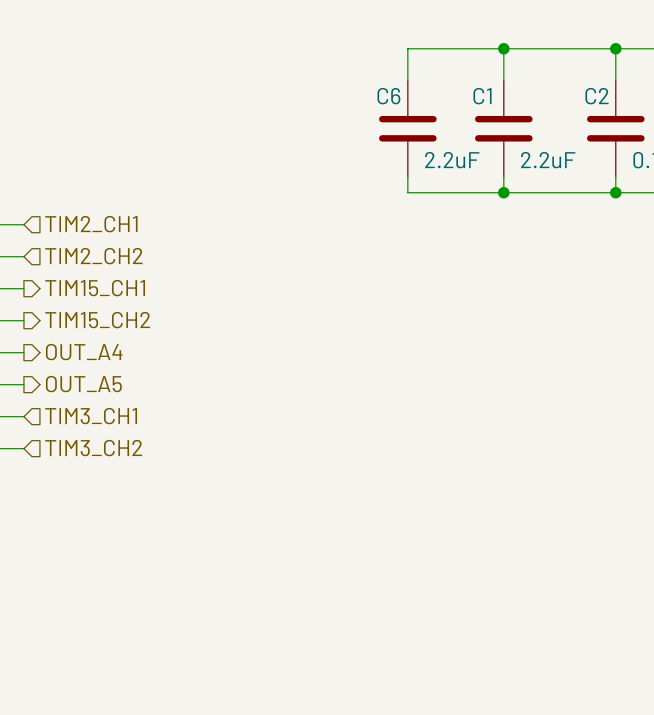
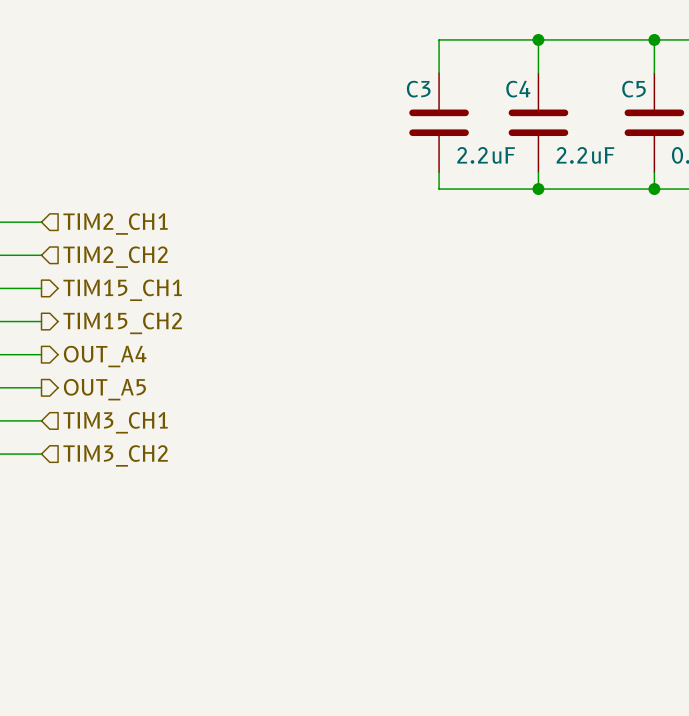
C6 name: C6 (388, 96) -> C3 (418, 89)
C1 name: C1 (482, 96) -> C4 (518, 89)
C2 name: C2 (597, 96) -> C5 (634, 89)

